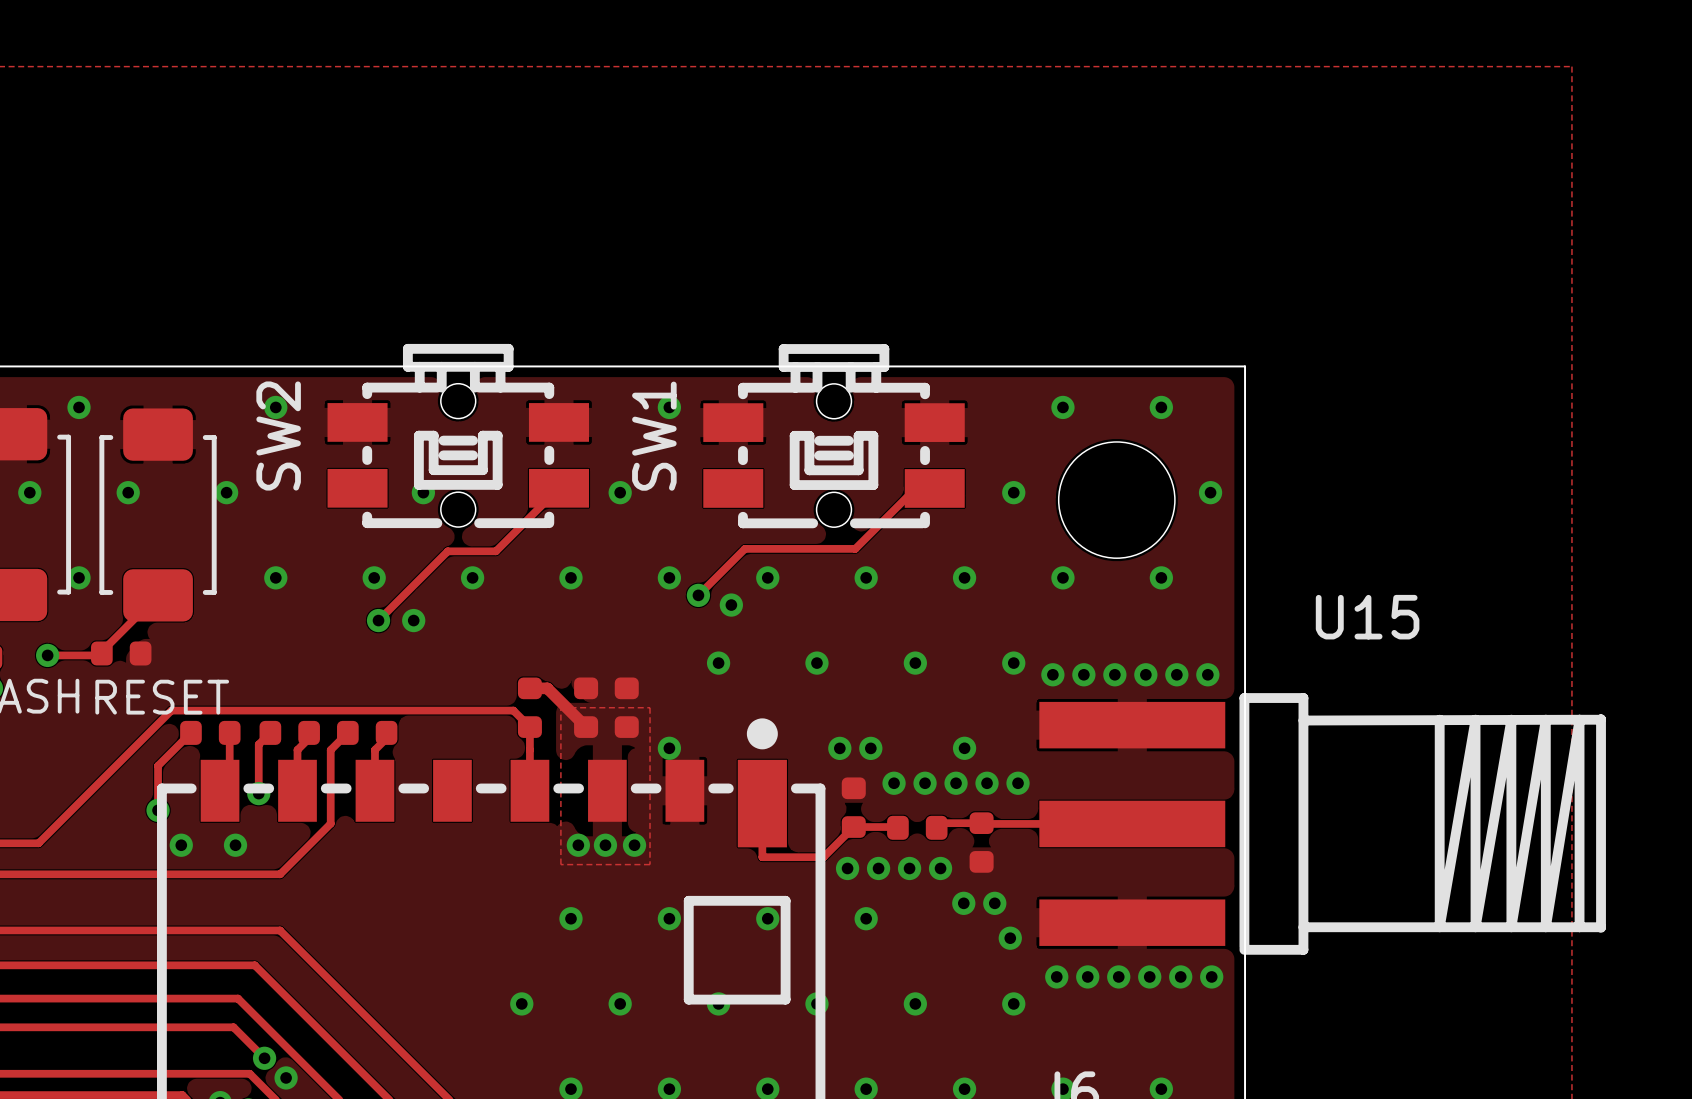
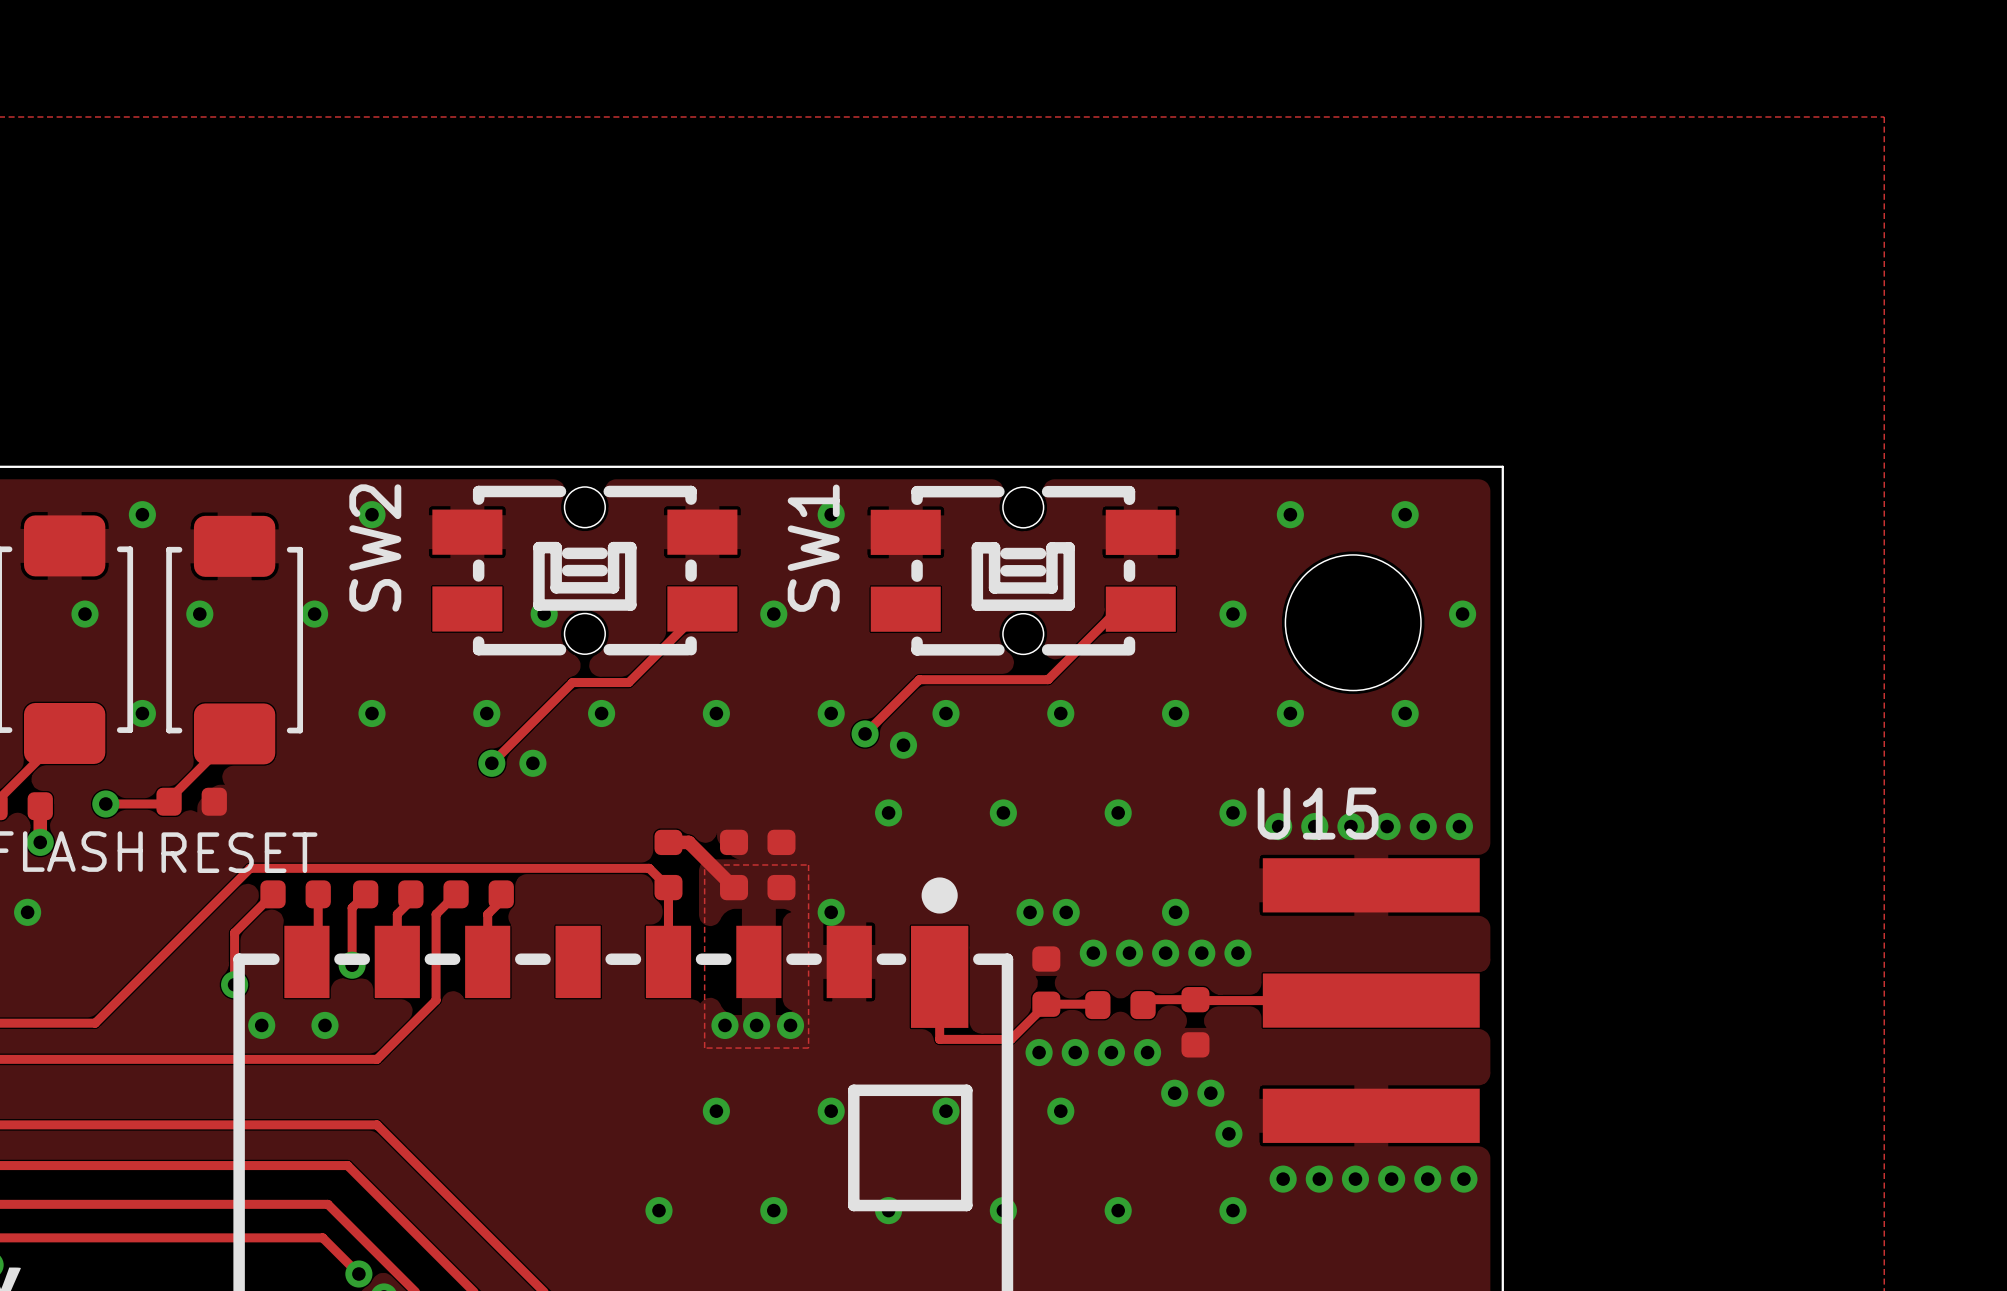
SW2 footprint: [327, 343, 590, 529] -> [432, 485, 738, 656]
SW1 footprint: [703, 344, 965, 529] -> [870, 485, 1176, 656]
U15 name position: U15 (1367, 617) -> U15 (1318, 813)
U15 footprint: [1039, 693, 1606, 955] -> [1262, 858, 1480, 1143]

